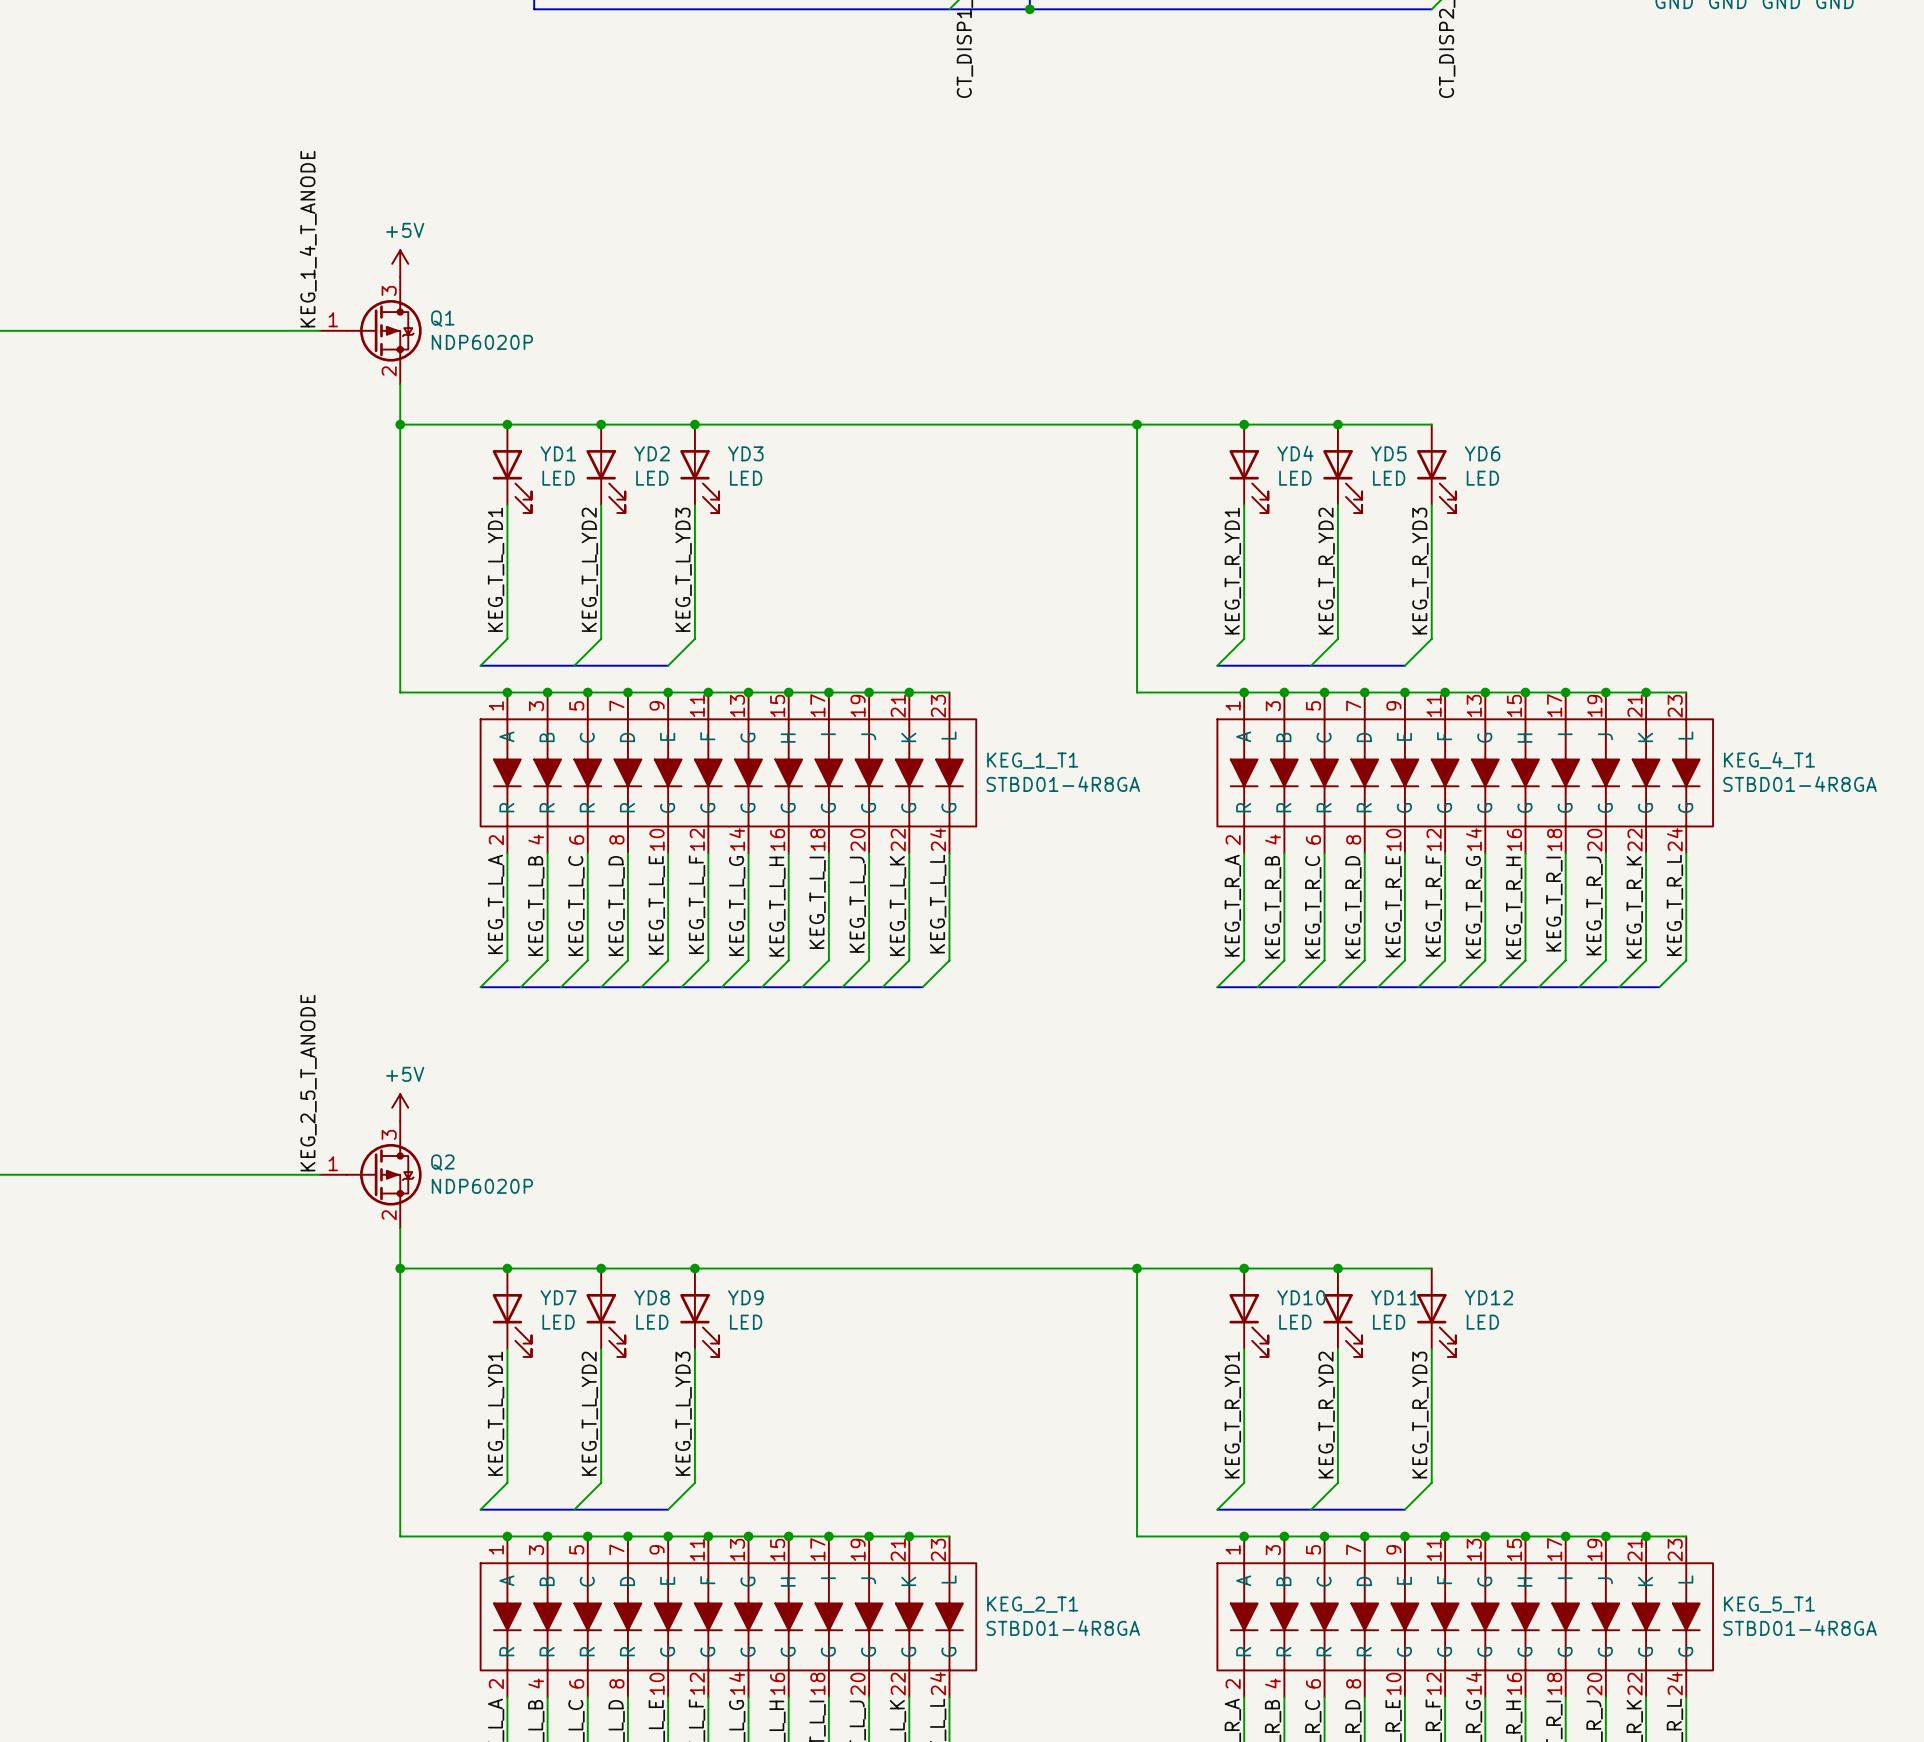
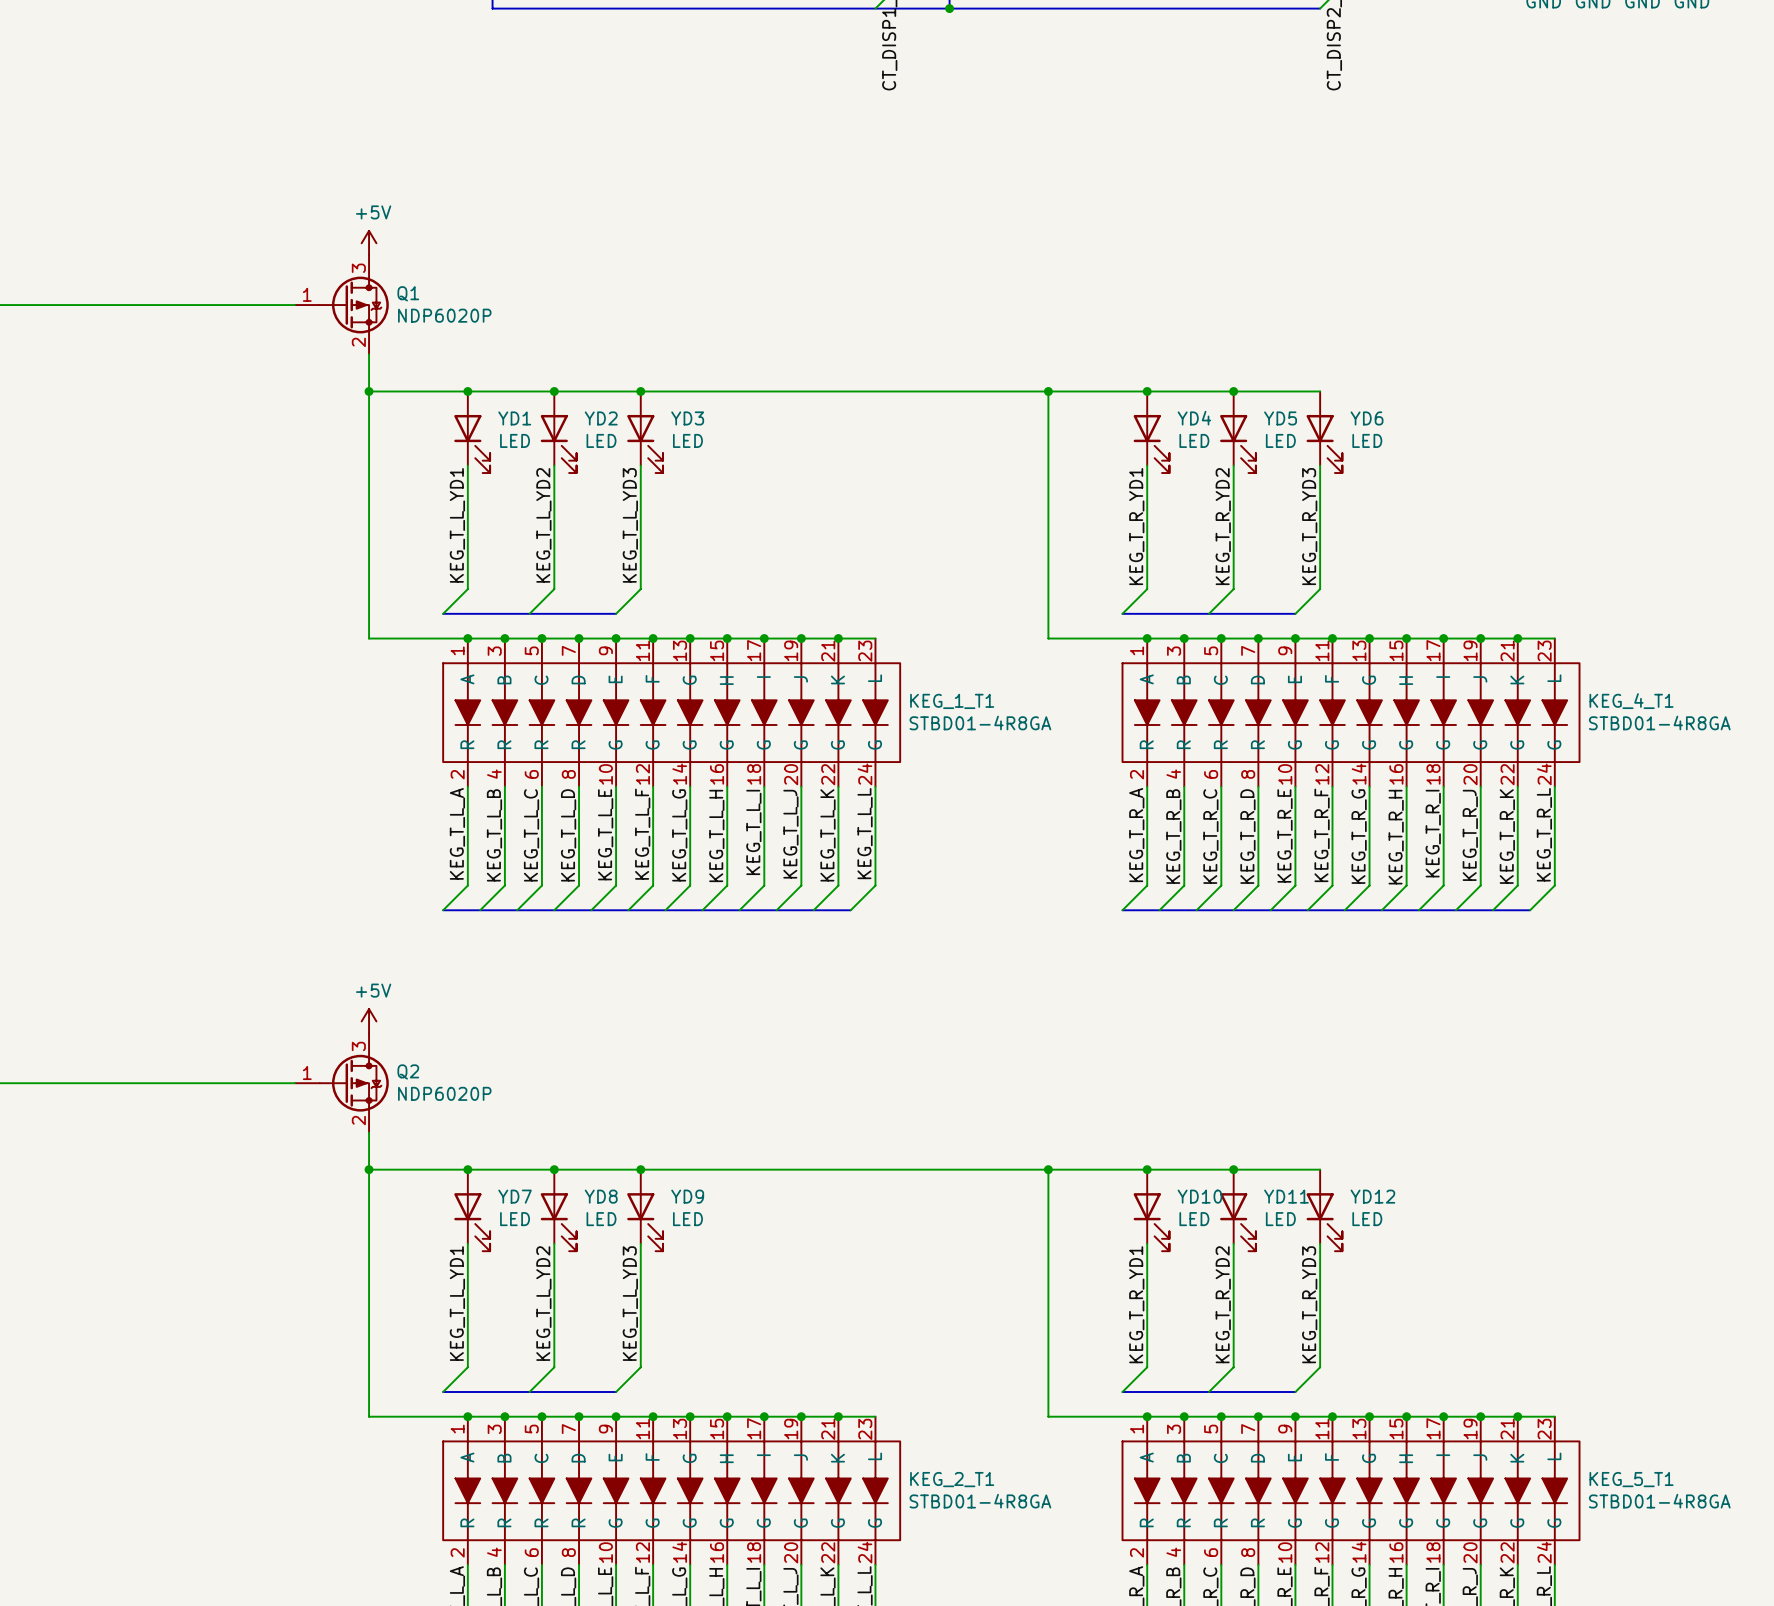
label: KEG_1_4_T_ANODE (308, 239) -> none
label: KEG_2_5_T_ANODE (308, 1083) -> none

